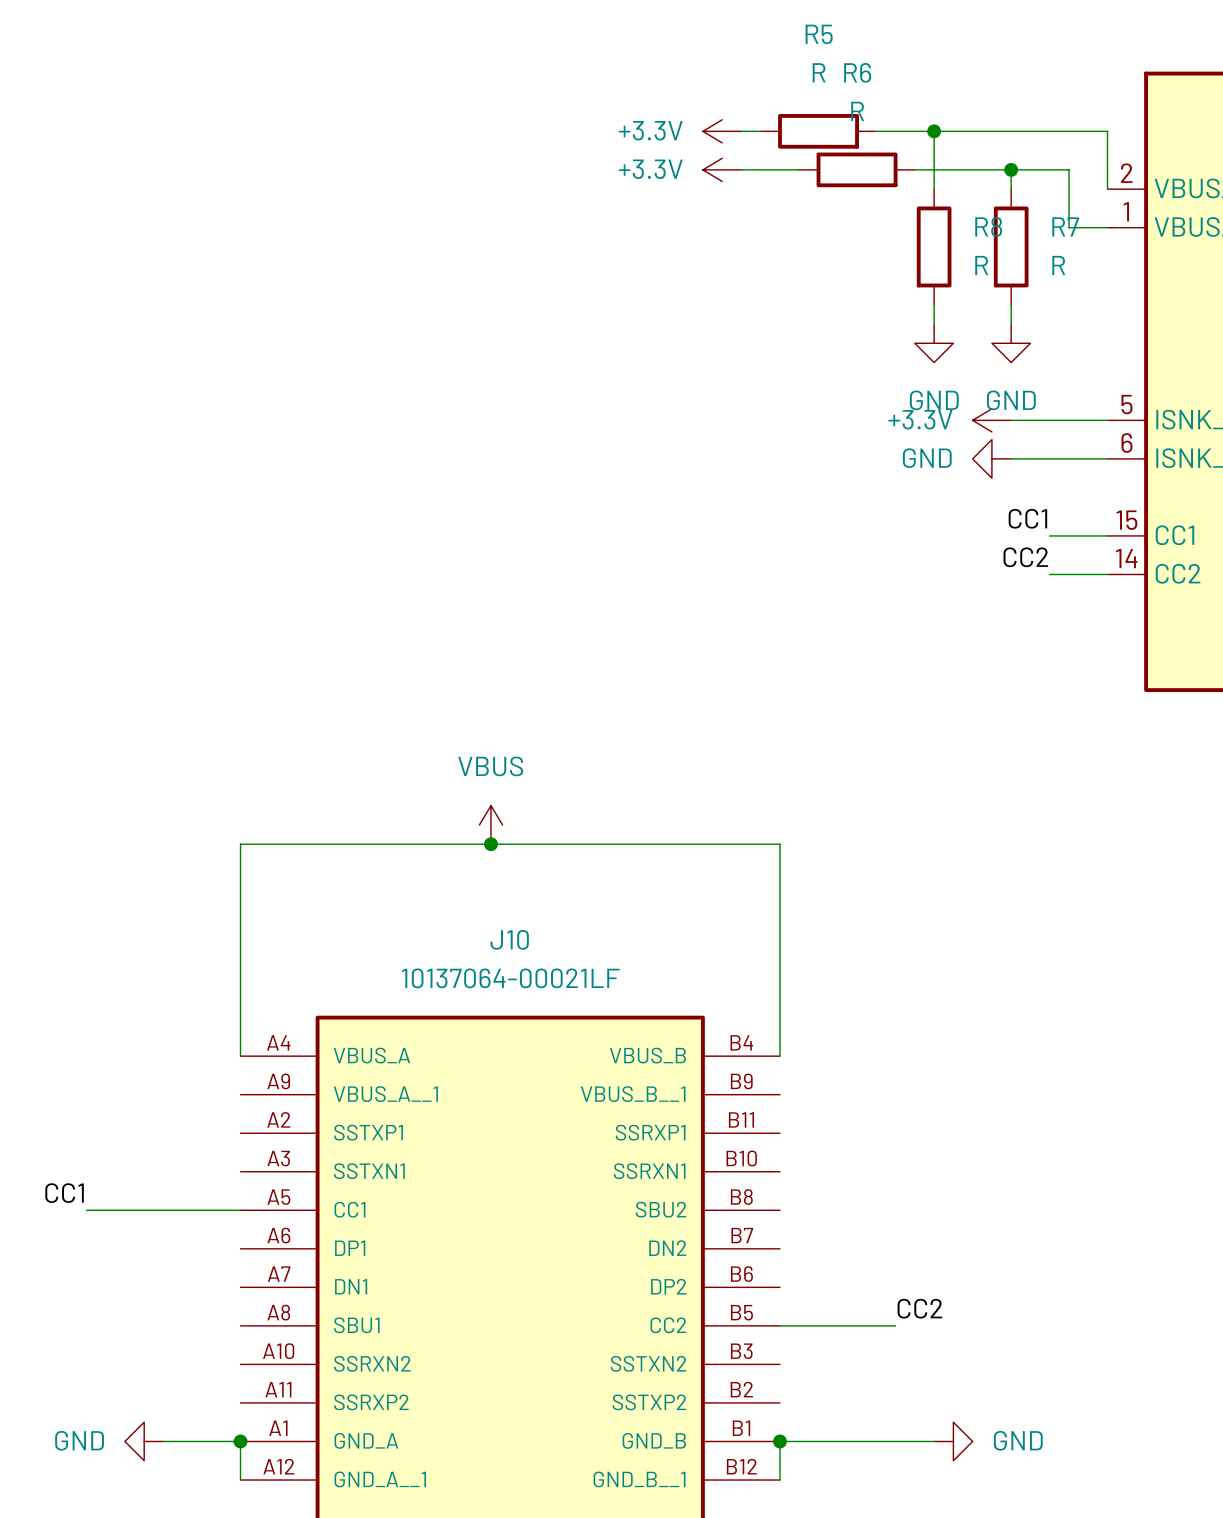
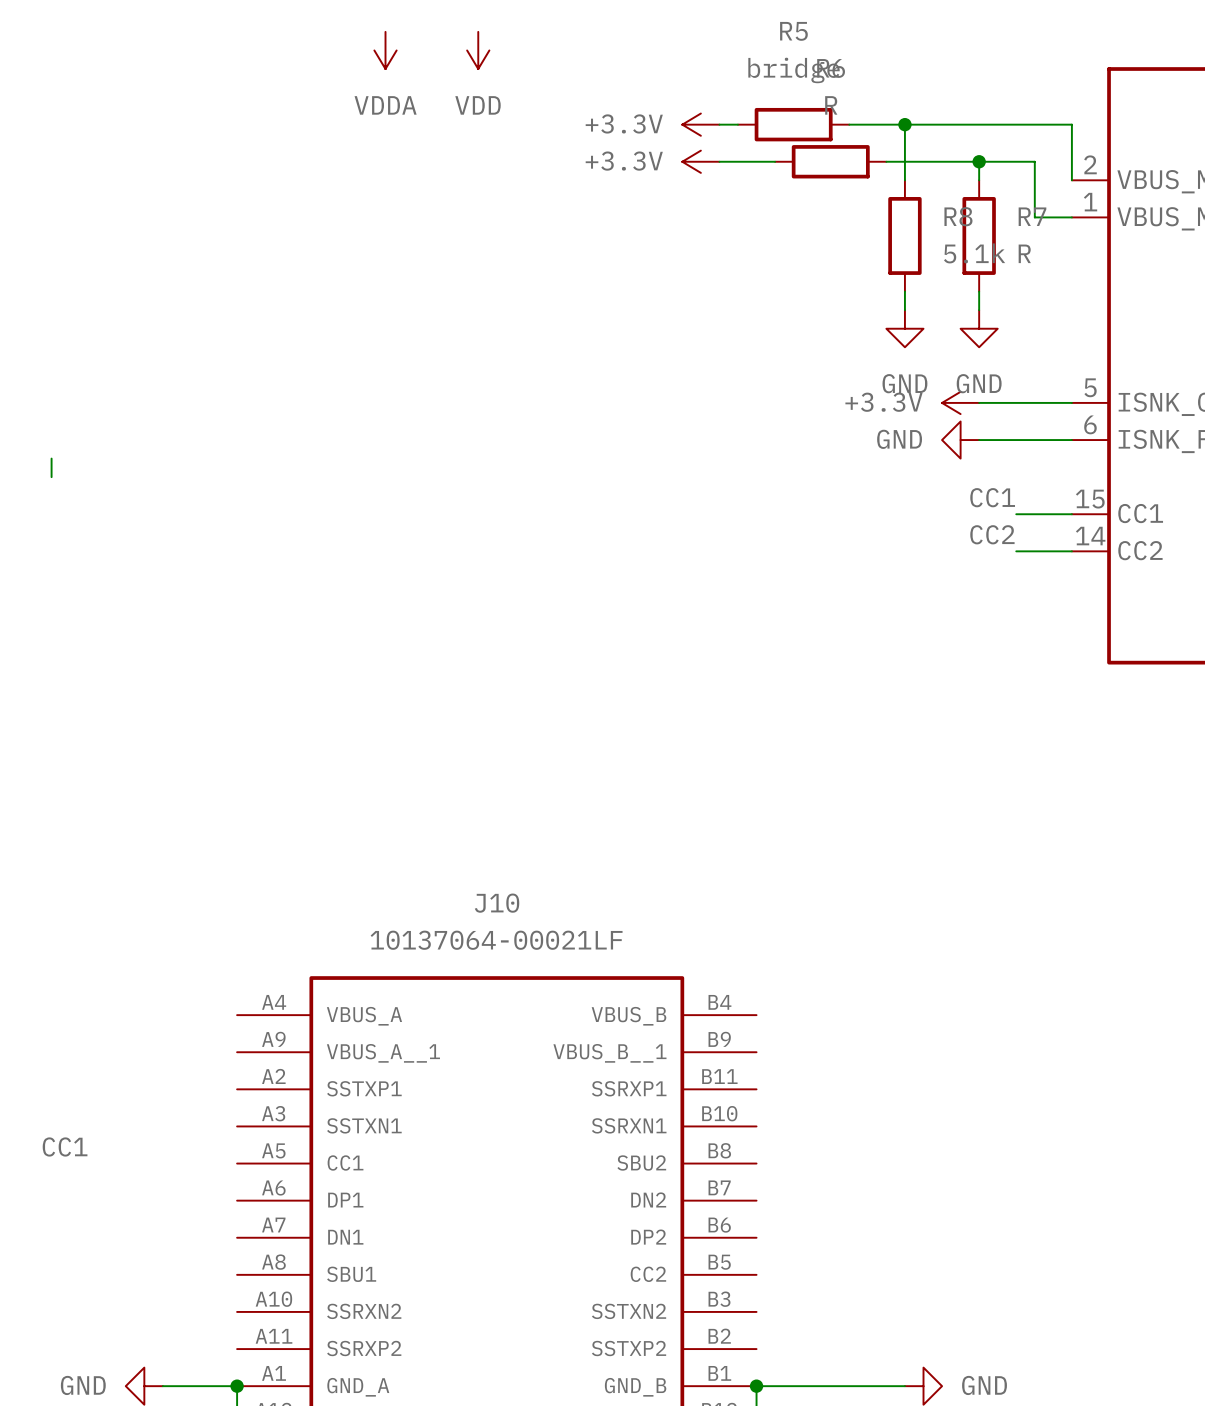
power symbol: none -> VDDA (385, 50)
power symbol: none -> VDD (478, 50)
R5 value: R (819, 72) -> bridge (794, 70)
R8 value: R (981, 265) -> 5.1k (974, 253)
wire: none -> (51, 458) (51, 477)
power symbol: VBUS (490, 824) -> none
junction: (490, 844) -> none
wire: (240, 1056) (240, 844) (779, 844) (779, 1056) -> none
wire: (86, 1210) (240, 1210) -> none
label: CC2 (919, 1308) -> none
wire: (779, 1325) (895, 1325) -> none

